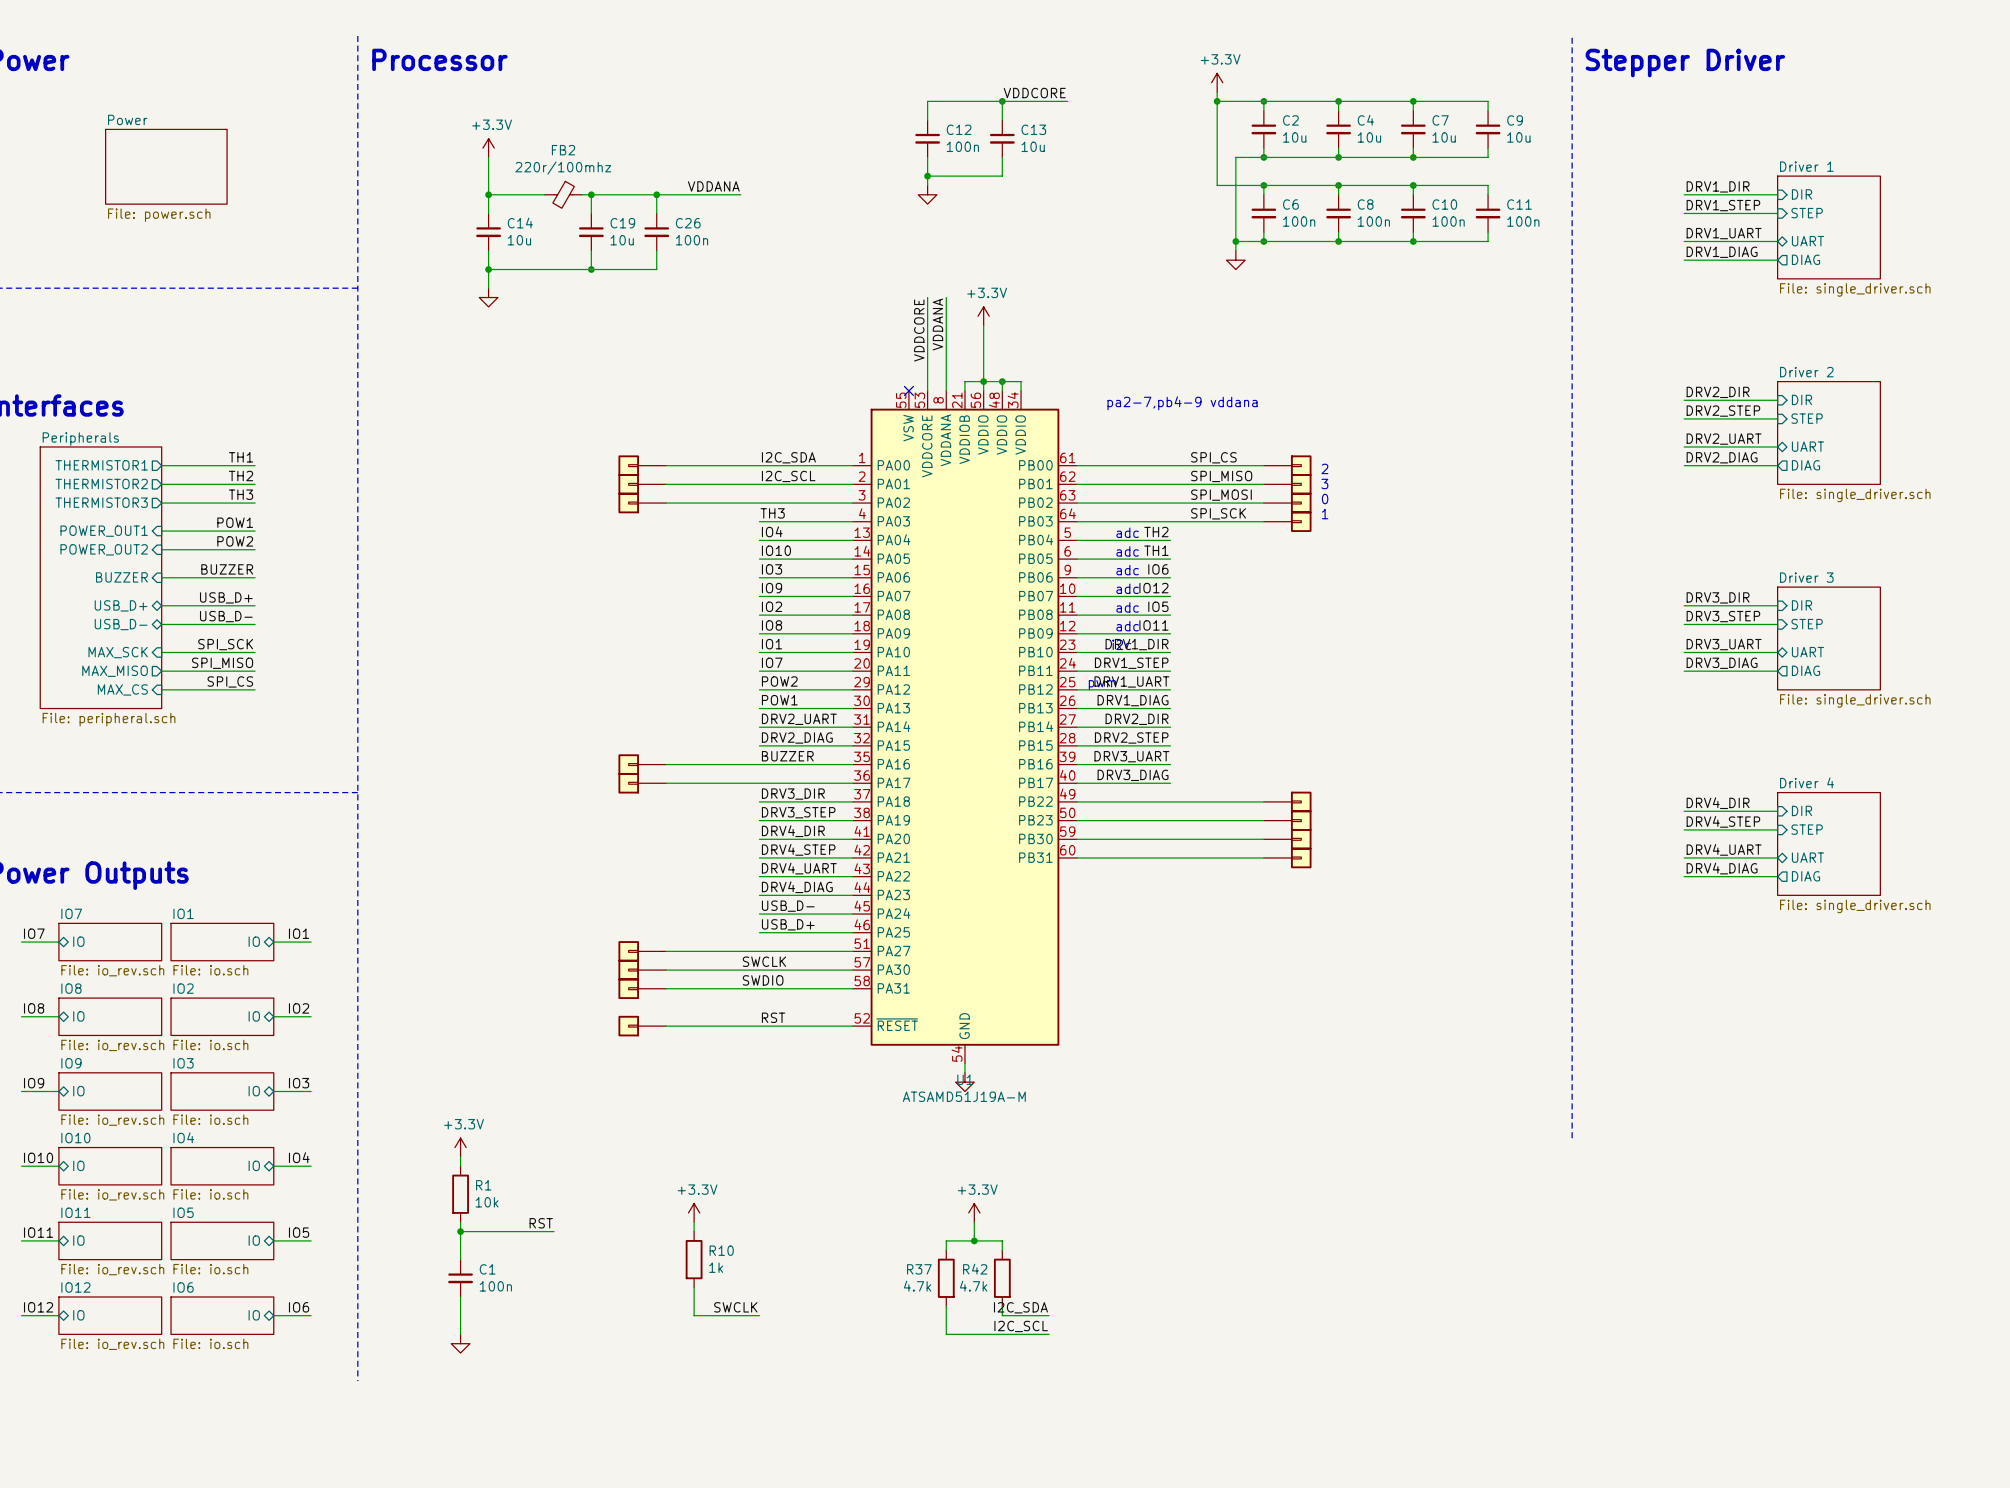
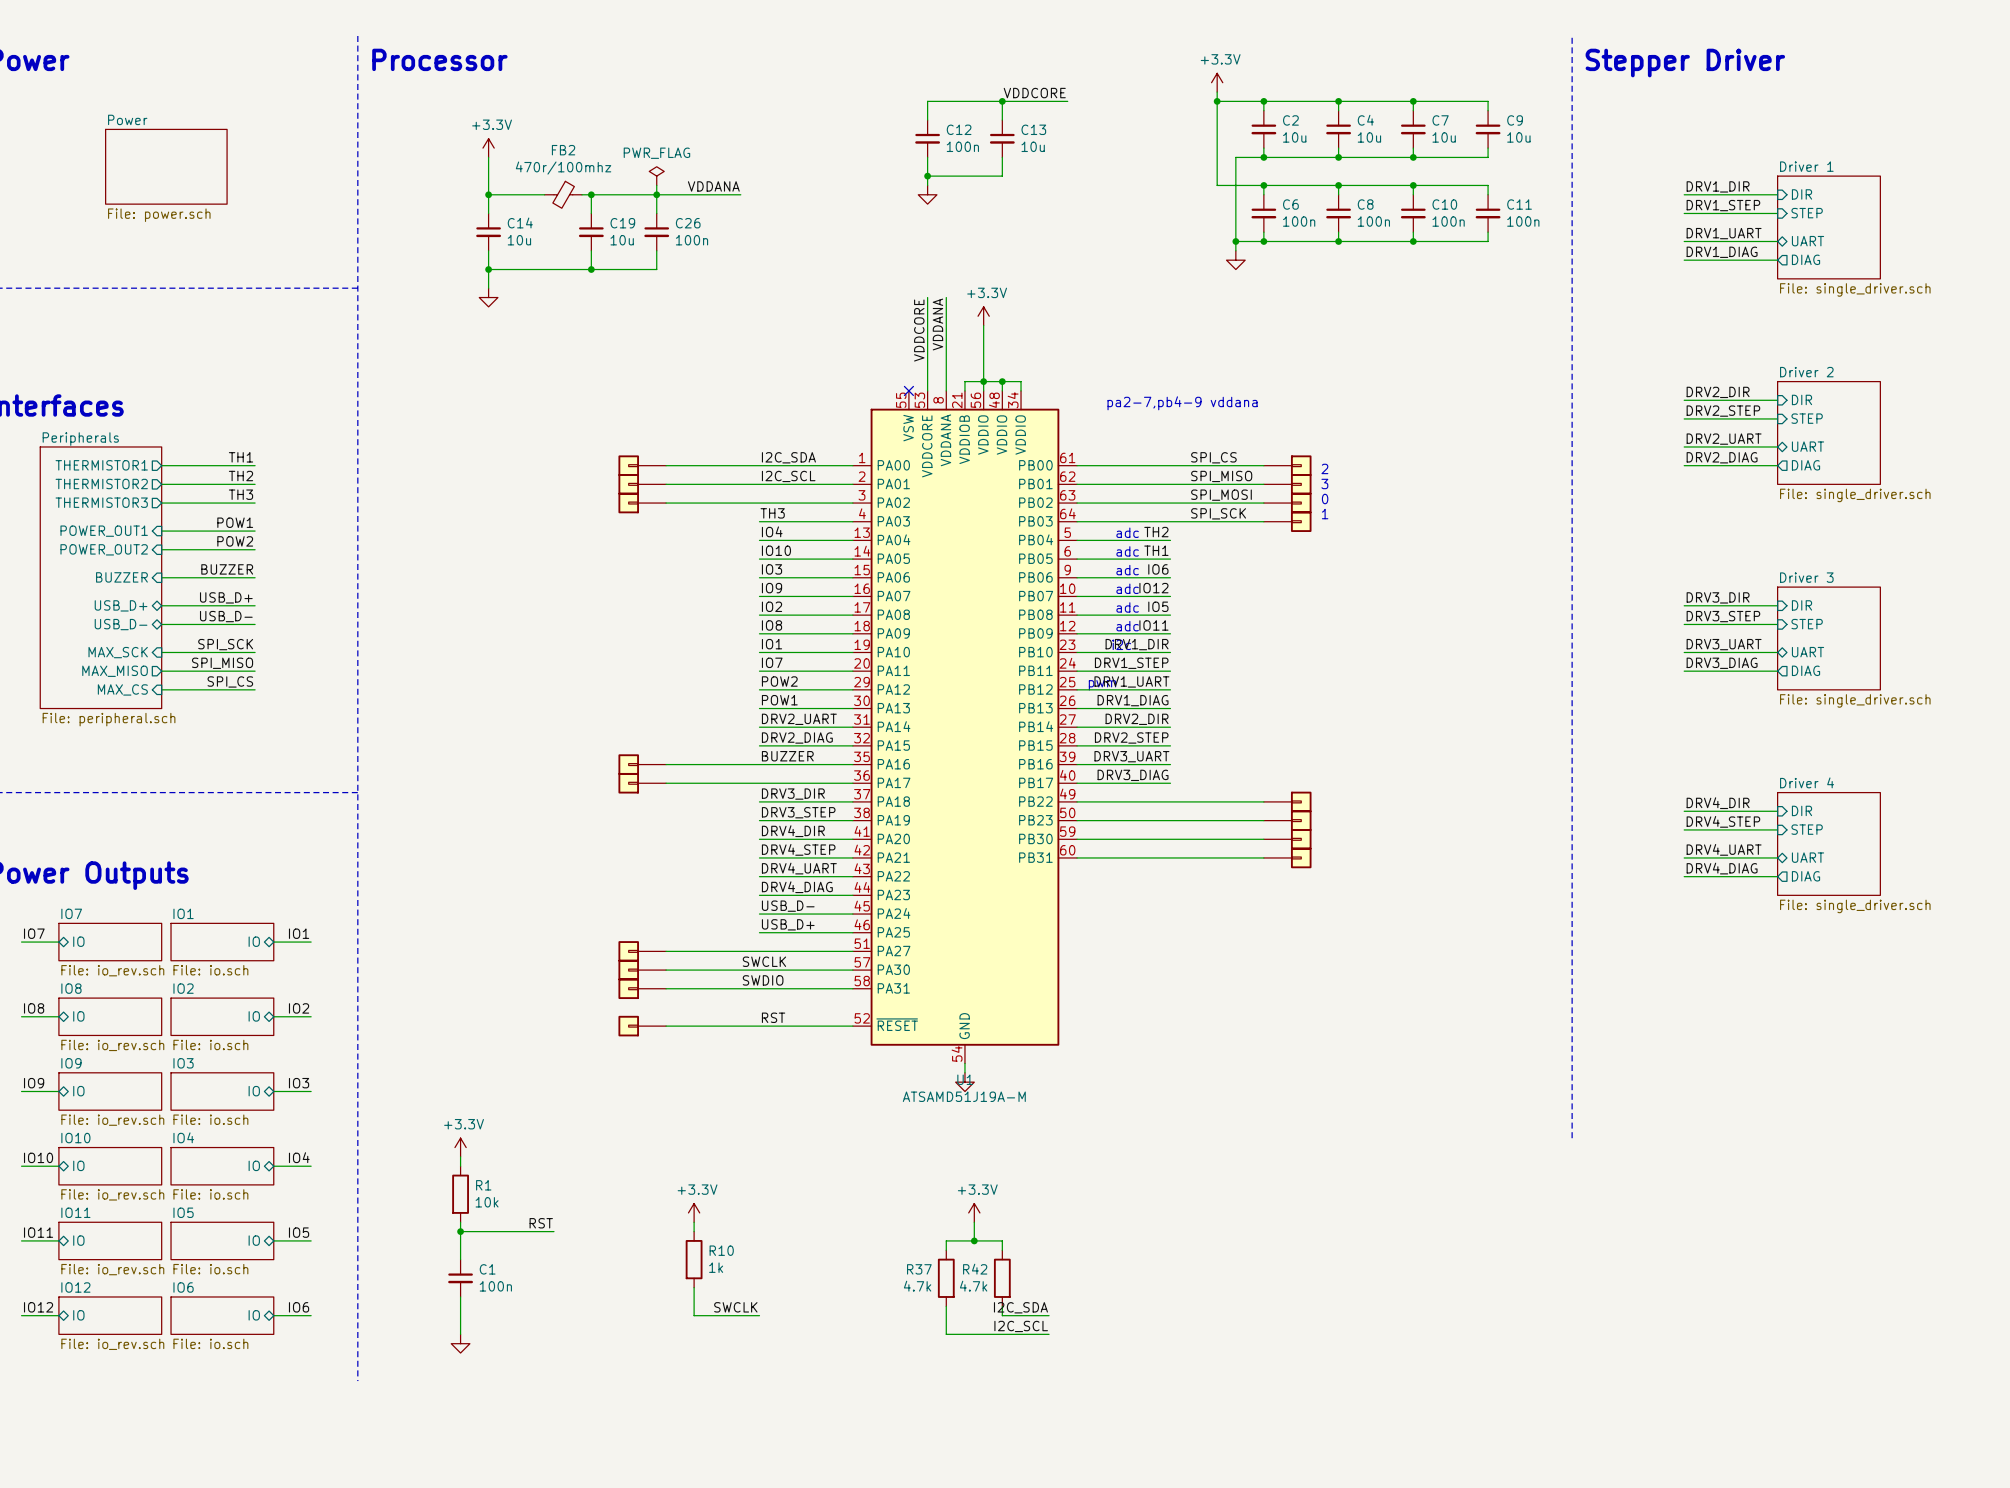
FB2 value: 220r/100mhz (563, 168) -> 470r/100mhz (563, 168)
power symbol: none -> PWR_FLAG (656, 176)
wire: none -> (656, 185) (656, 194)

